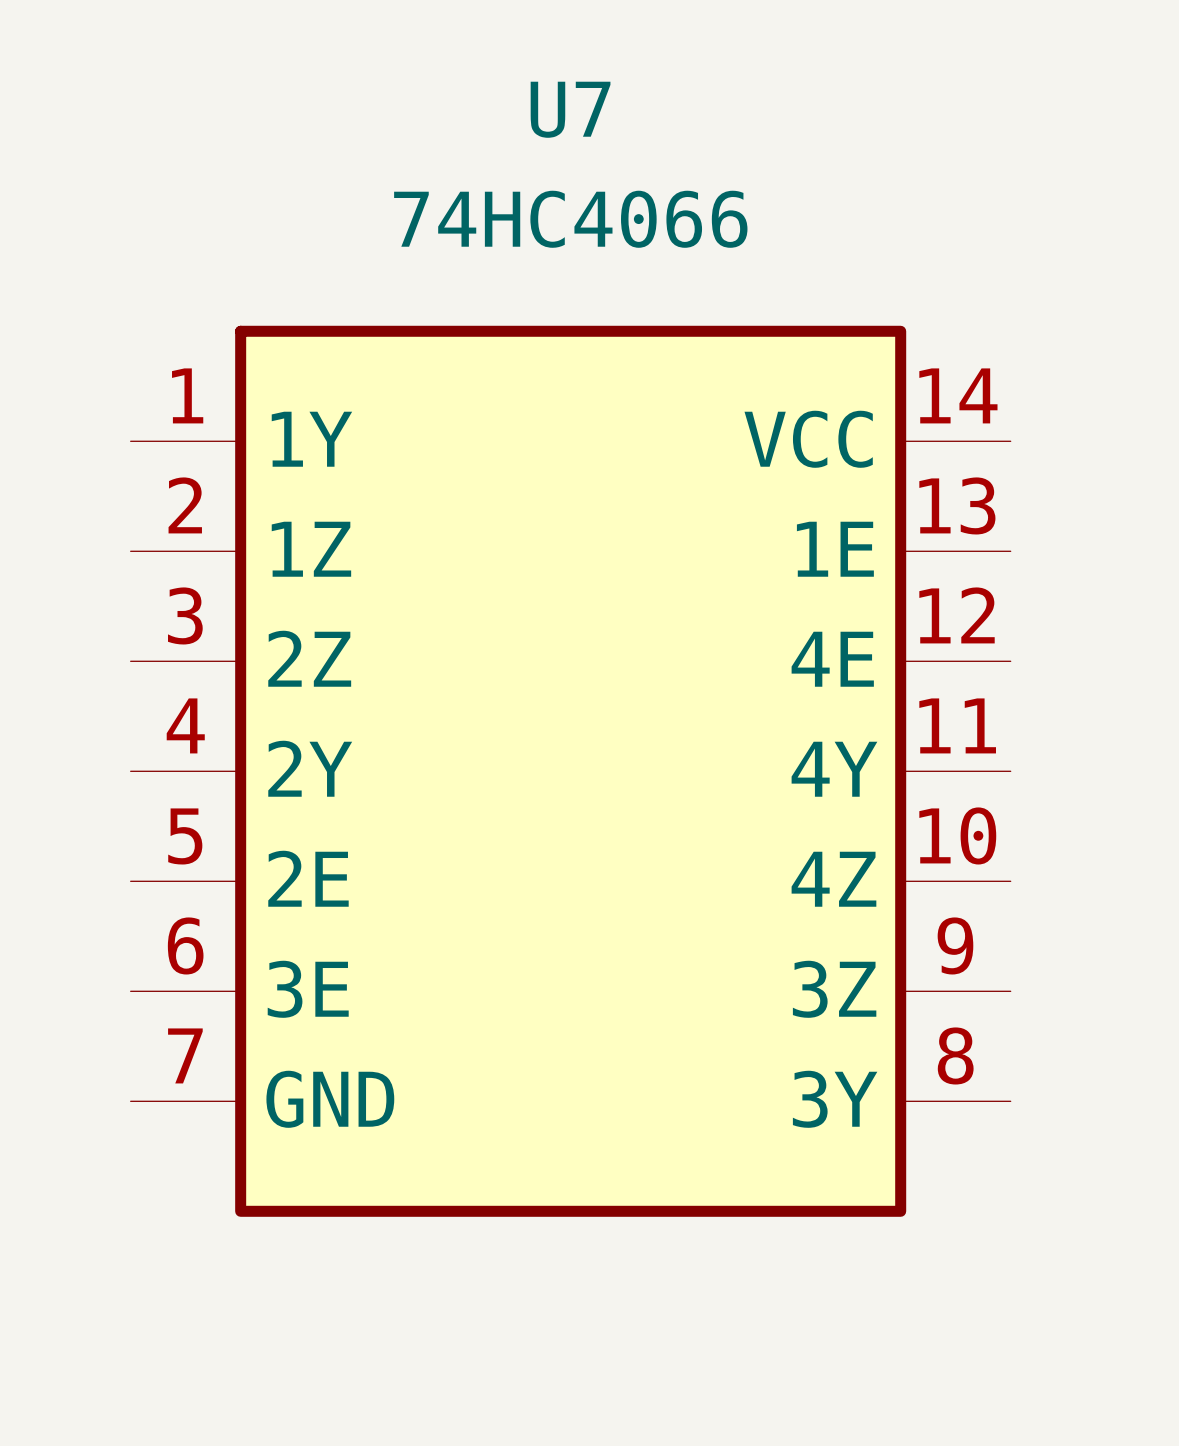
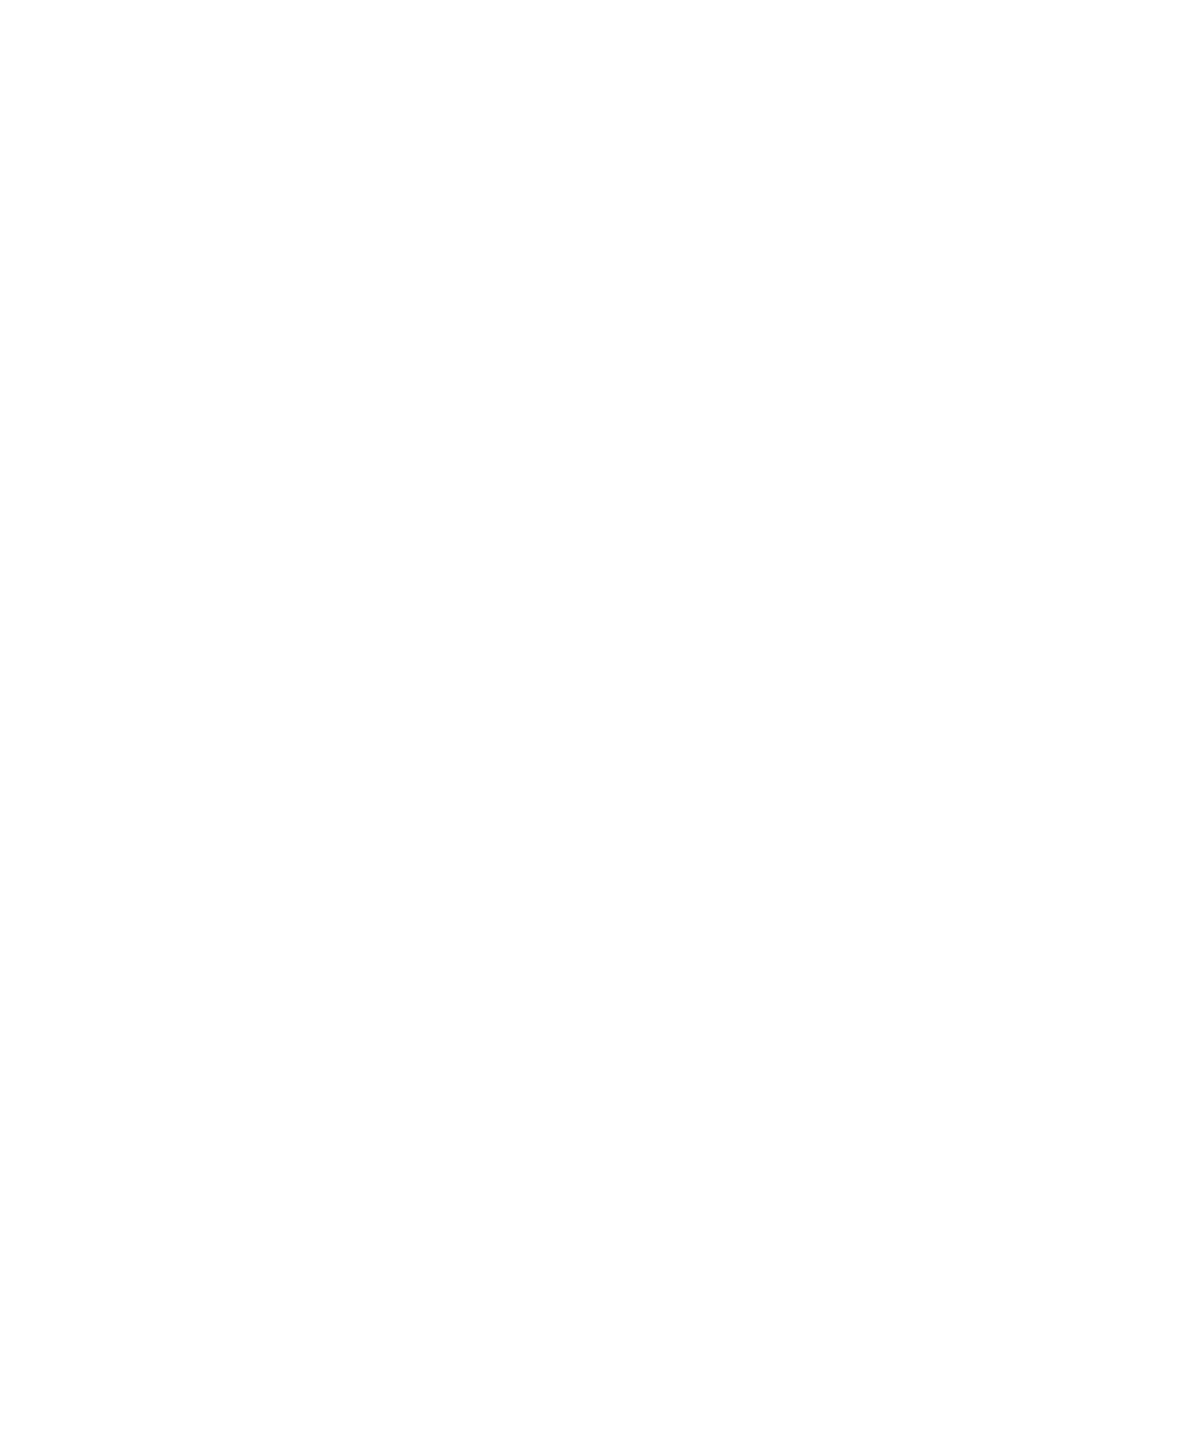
U7: 74HC4066 (570, 771) -> none

